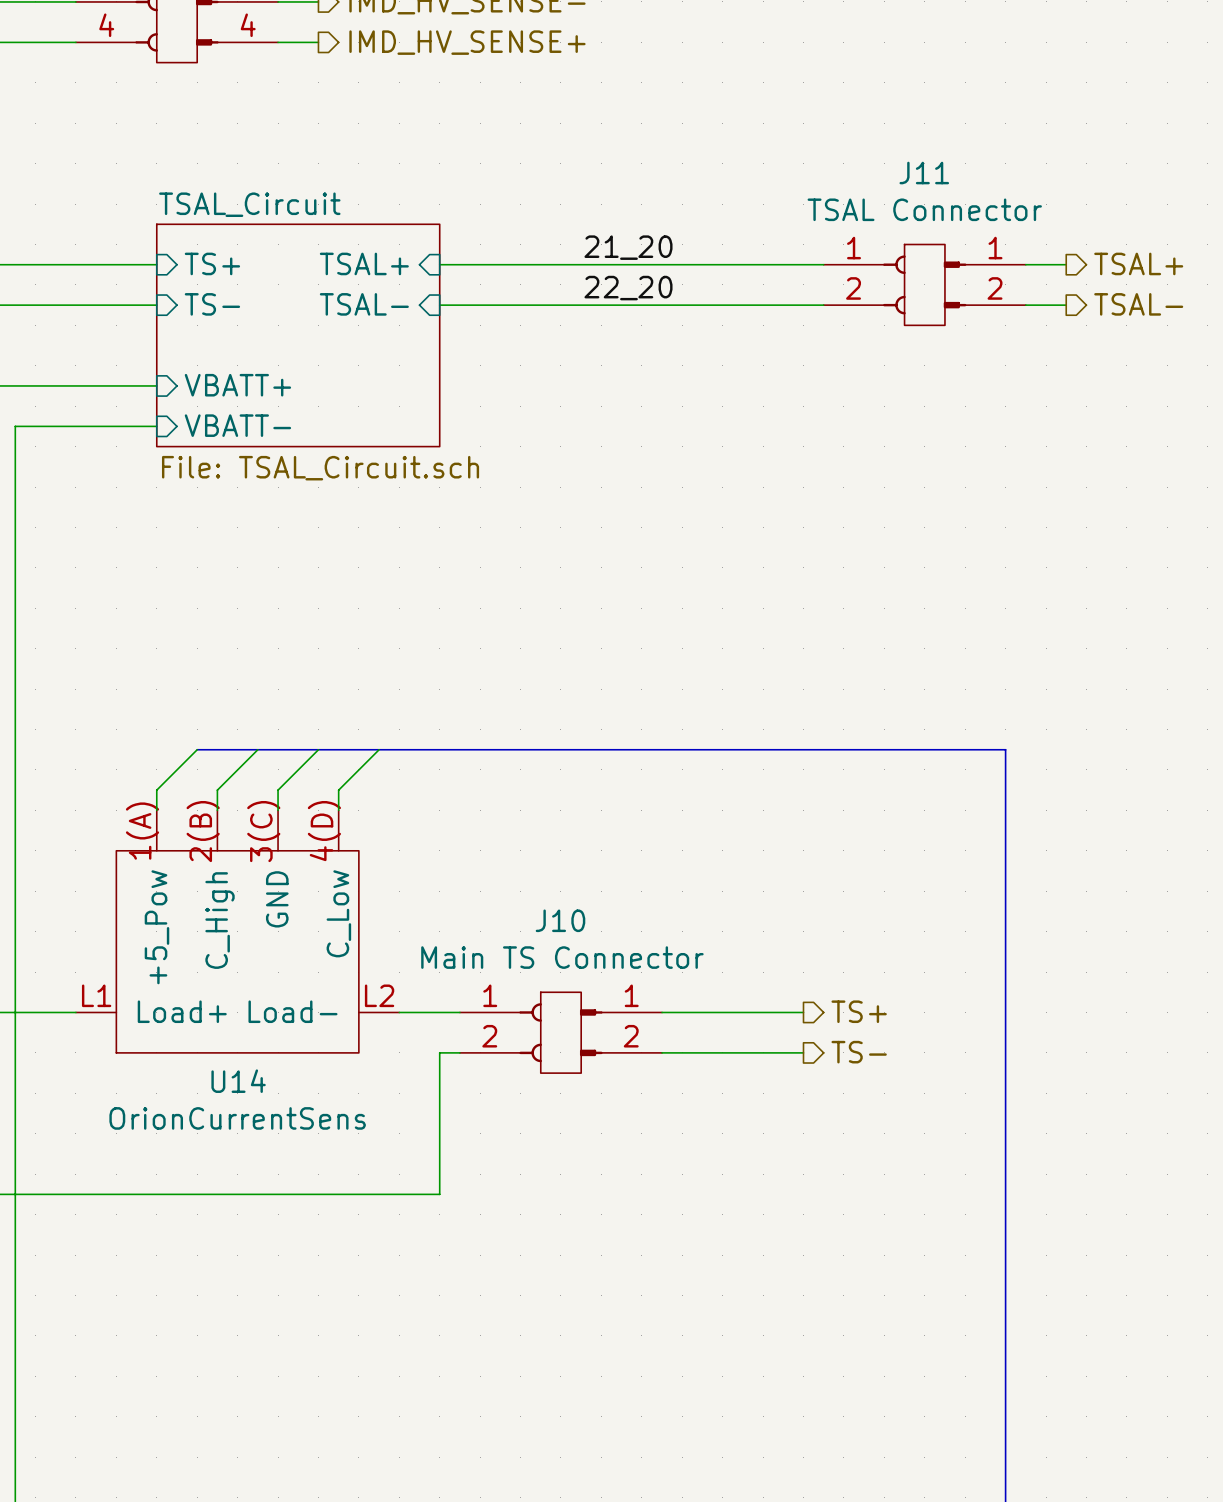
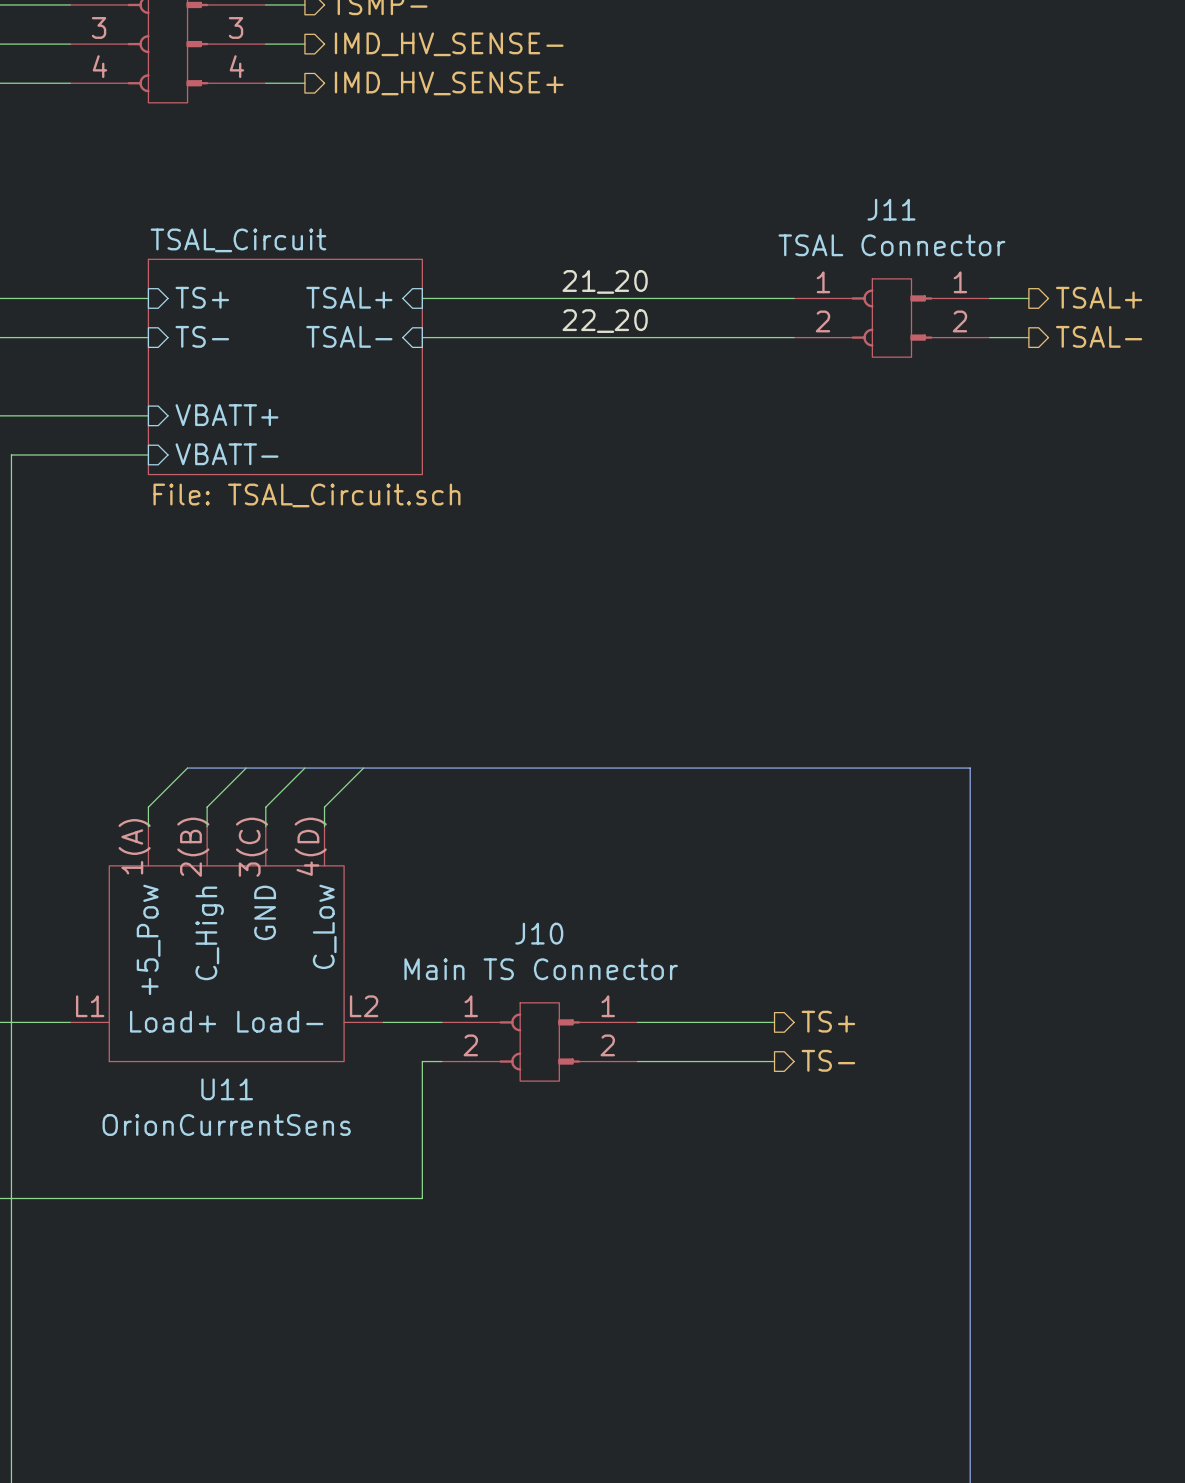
U14 name: U14 (238, 1081) -> U11 (227, 1089)

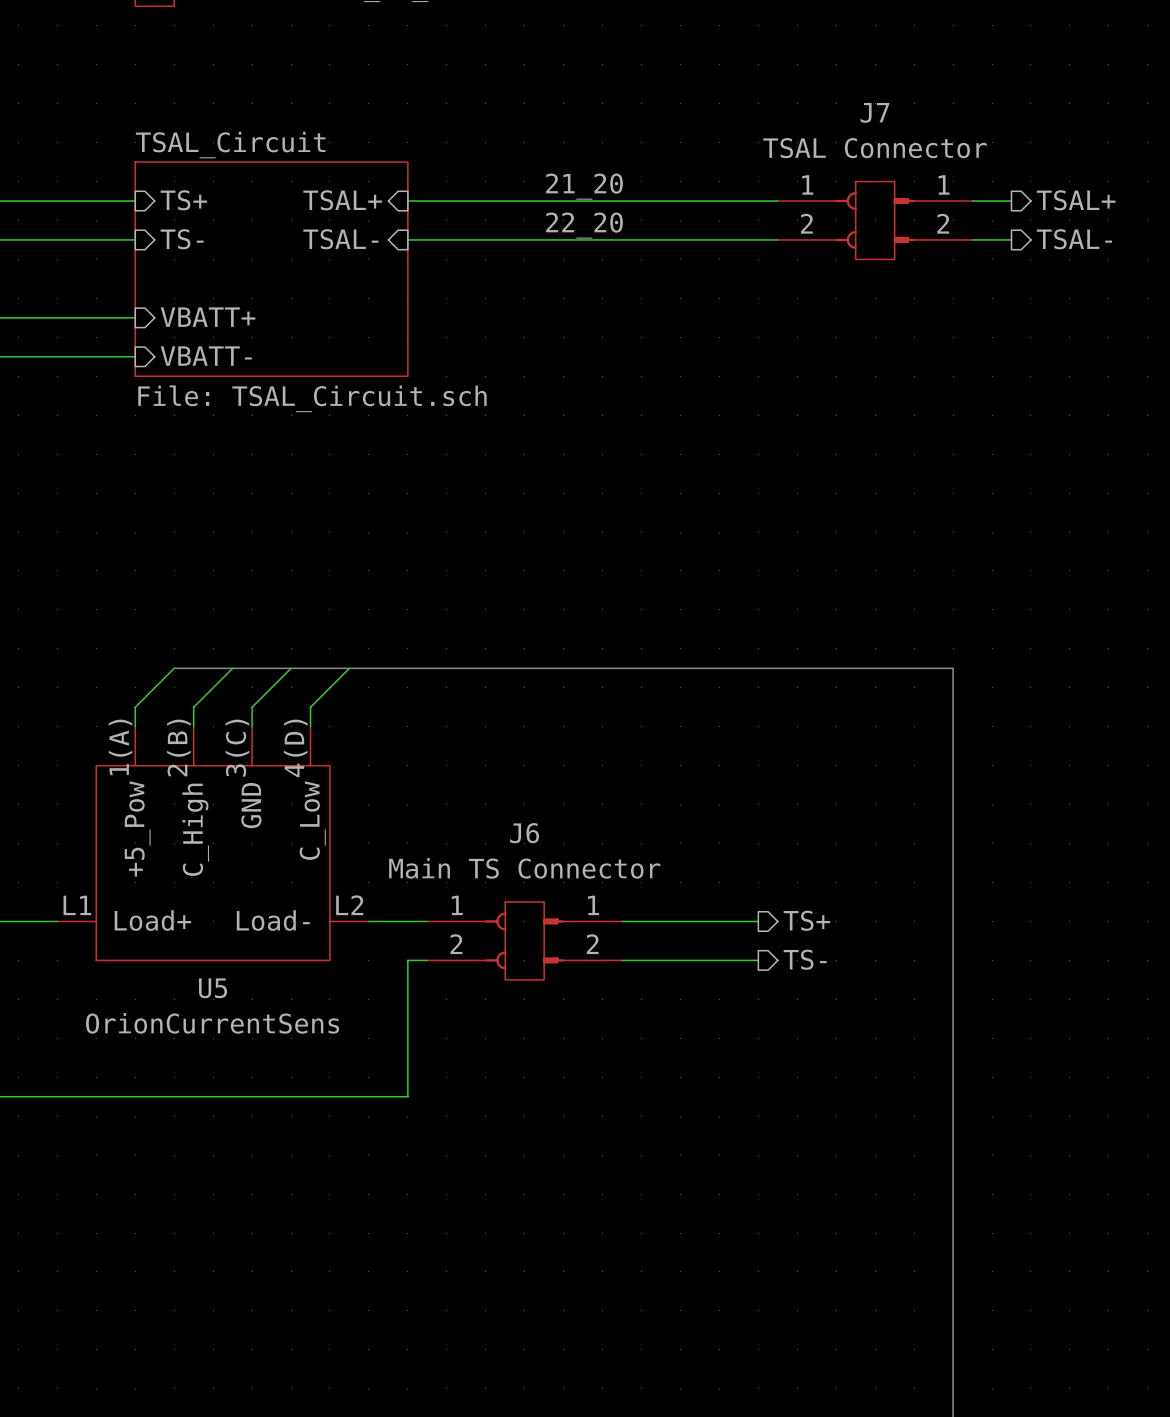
J11 name: J11 (891, 209) -> J7 (874, 112)
J10 name: J10 (539, 933) -> J6 (524, 833)
U11 name: U11 (227, 1089) -> U5 (213, 988)

